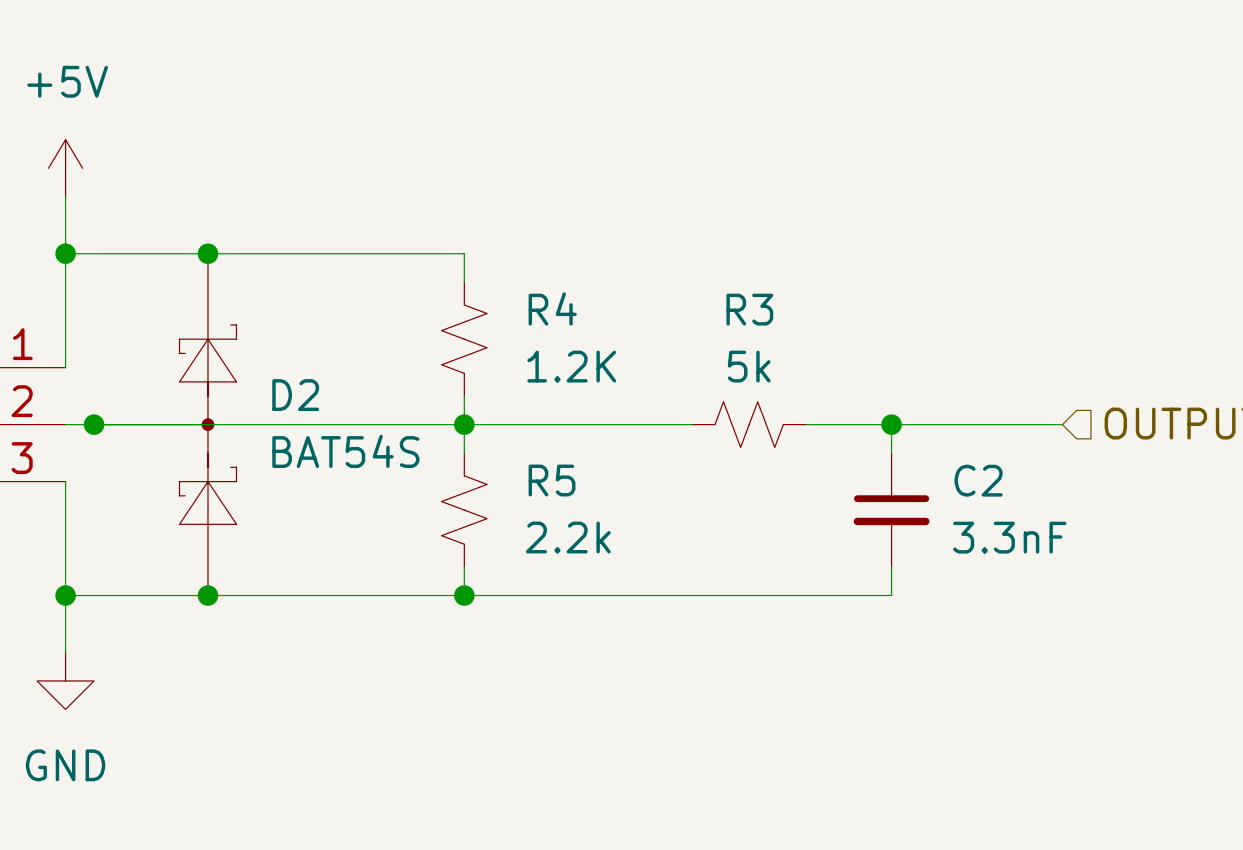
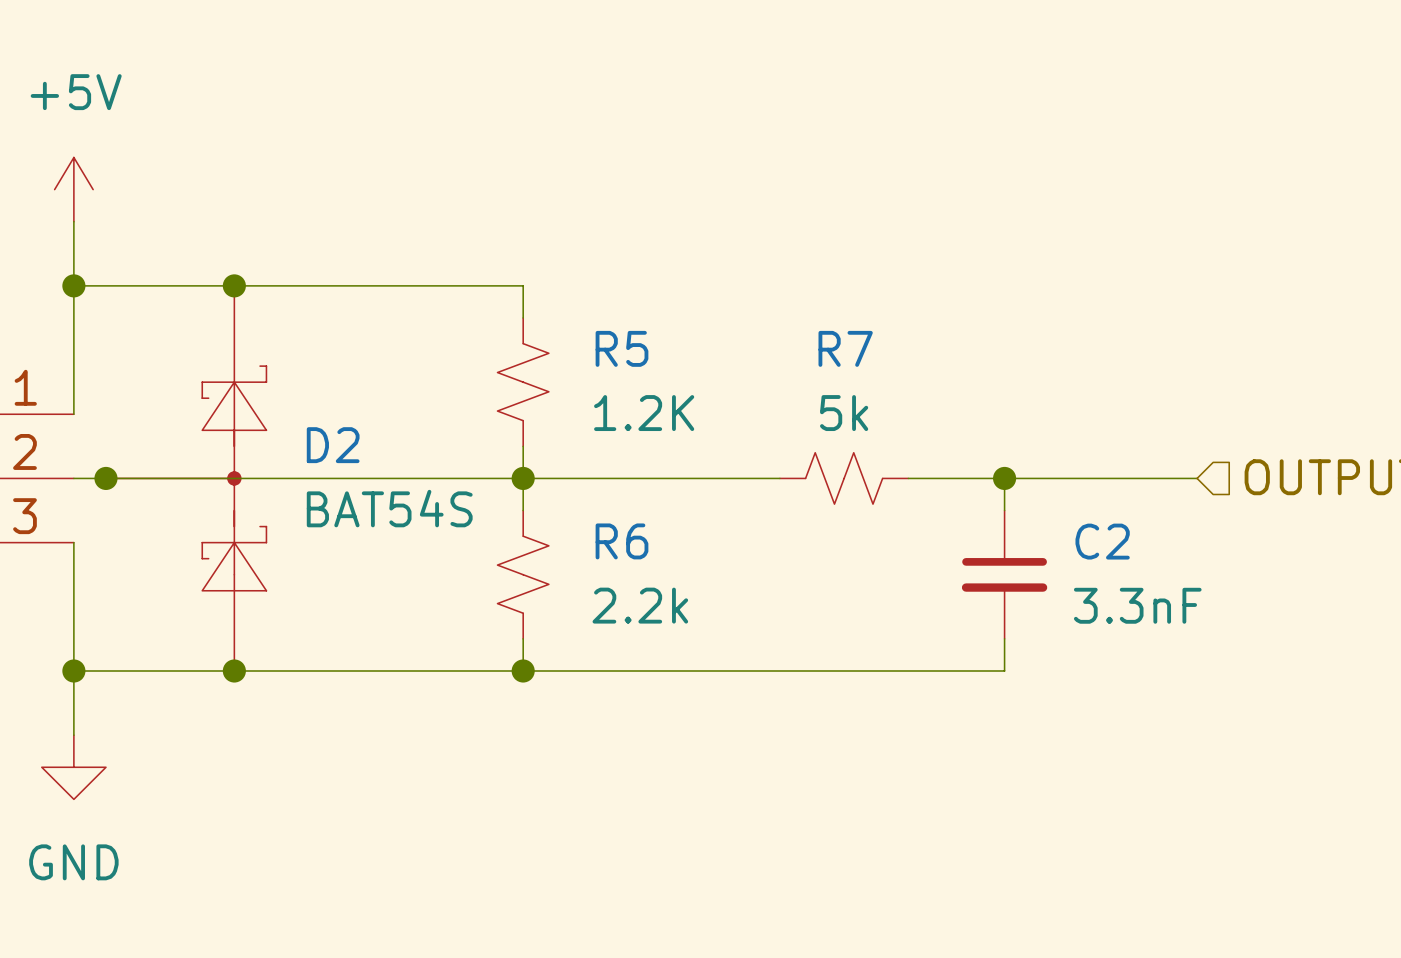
R4 name: R4 (552, 308) -> R5 (621, 348)
R3 name: R3 (749, 309) -> R7 (845, 348)
R5 name: R5 (552, 480) -> R6 (621, 541)

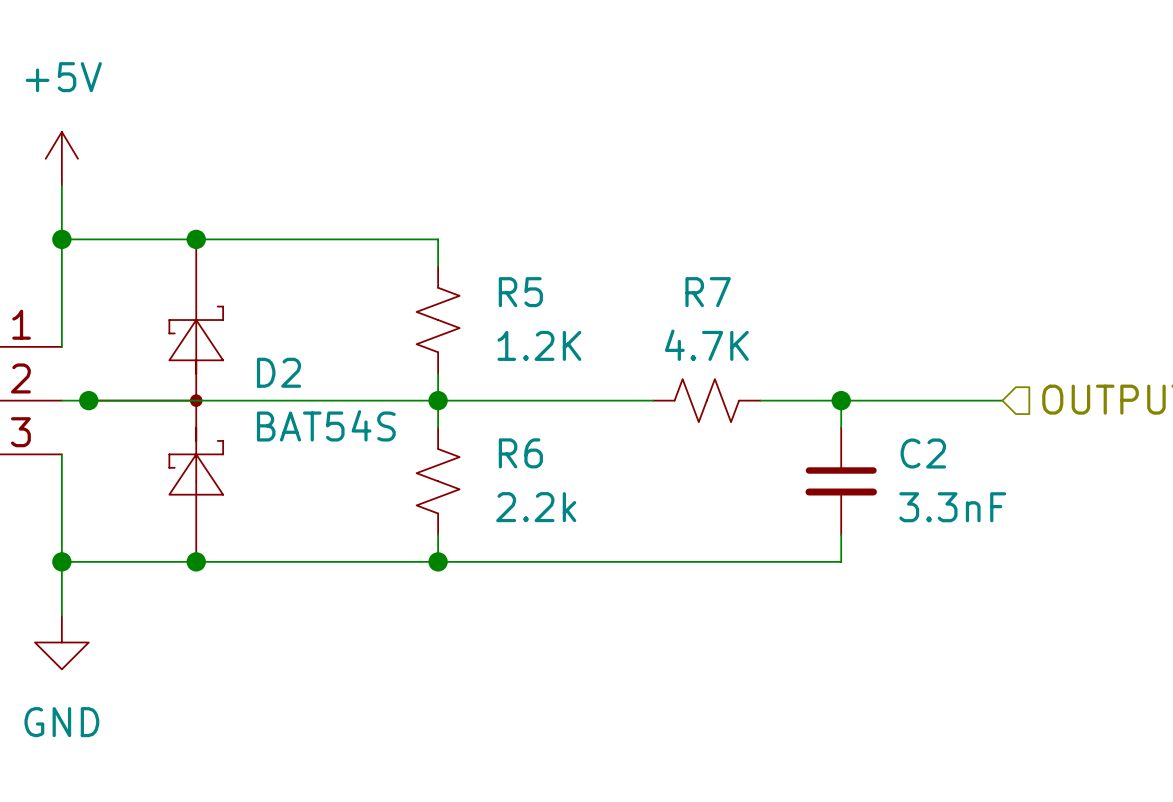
R7 value: 5k (844, 413) -> 4.7K (706, 345)

